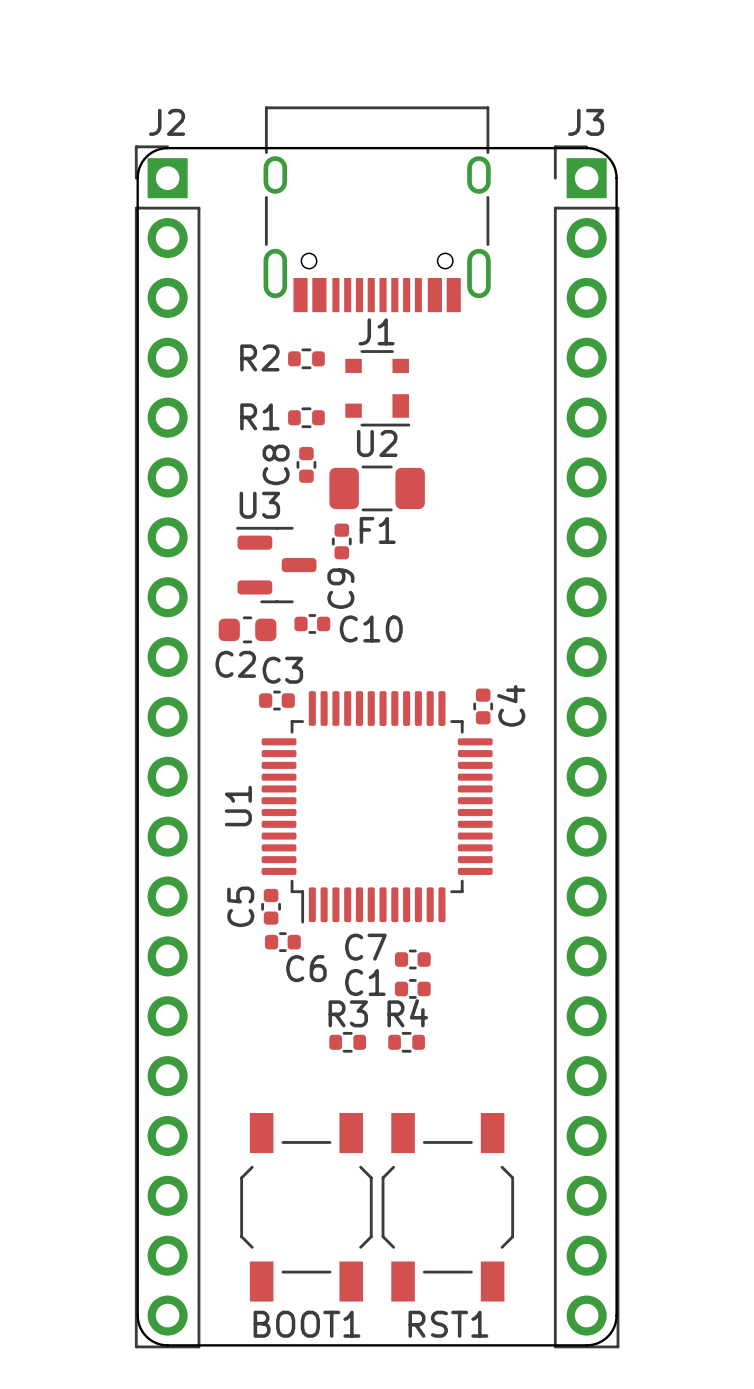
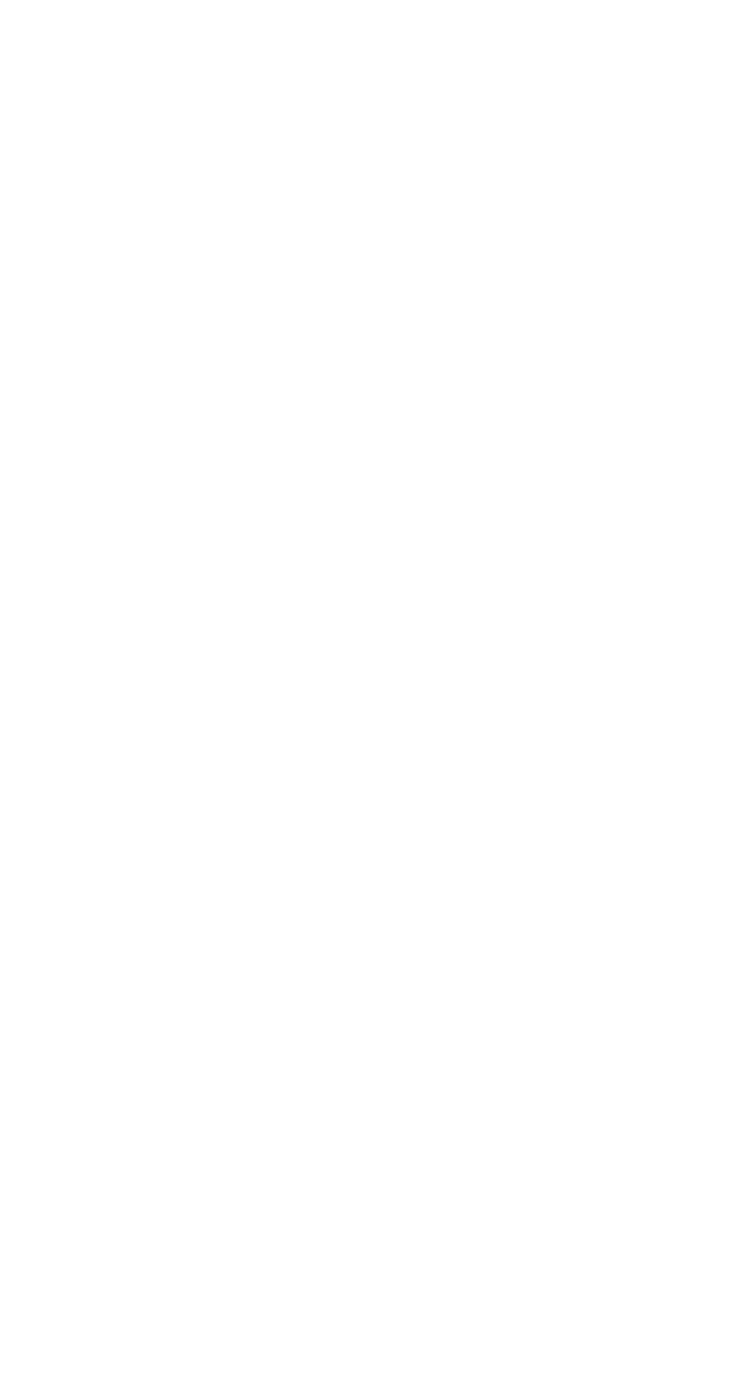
board edge: (167, 148) (586, 148) (602, 152) (610, 159) (614, 168) (616, 178) (616, 1315) (614, 1325) (610, 1334) (596, 1343) (586, 1345) (167, 1345) (157, 1343) (148, 1338) (139, 1325) (137, 1315) (137, 178) (139, 168) (146, 156) (154, 151) (167, 148) -> none
J1: (377, 209) -> none
R2: (306, 358) -> none
U2: (377, 388) -> none
R1: (306, 417) -> none
C8: (306, 464) -> none
F1: (377, 488) -> none
C9: (341, 541) -> none
U3: (276, 565) -> none
C10: (312, 623) -> none
C2: (247, 629) -> none
C3: (276, 700) -> none
C4: (483, 706) -> none
J2: (167, 746) -> none
J3: (586, 746) -> none
U1: (377, 807) -> none
C5: (271, 906) -> none
C6: (282, 942) -> none
C7: (412, 959) -> none
C1: (412, 988) -> none
R3: (347, 1042) -> none
R4: (406, 1042) -> none
BOOT1: (306, 1207) -> none
RST1: (447, 1207) -> none

